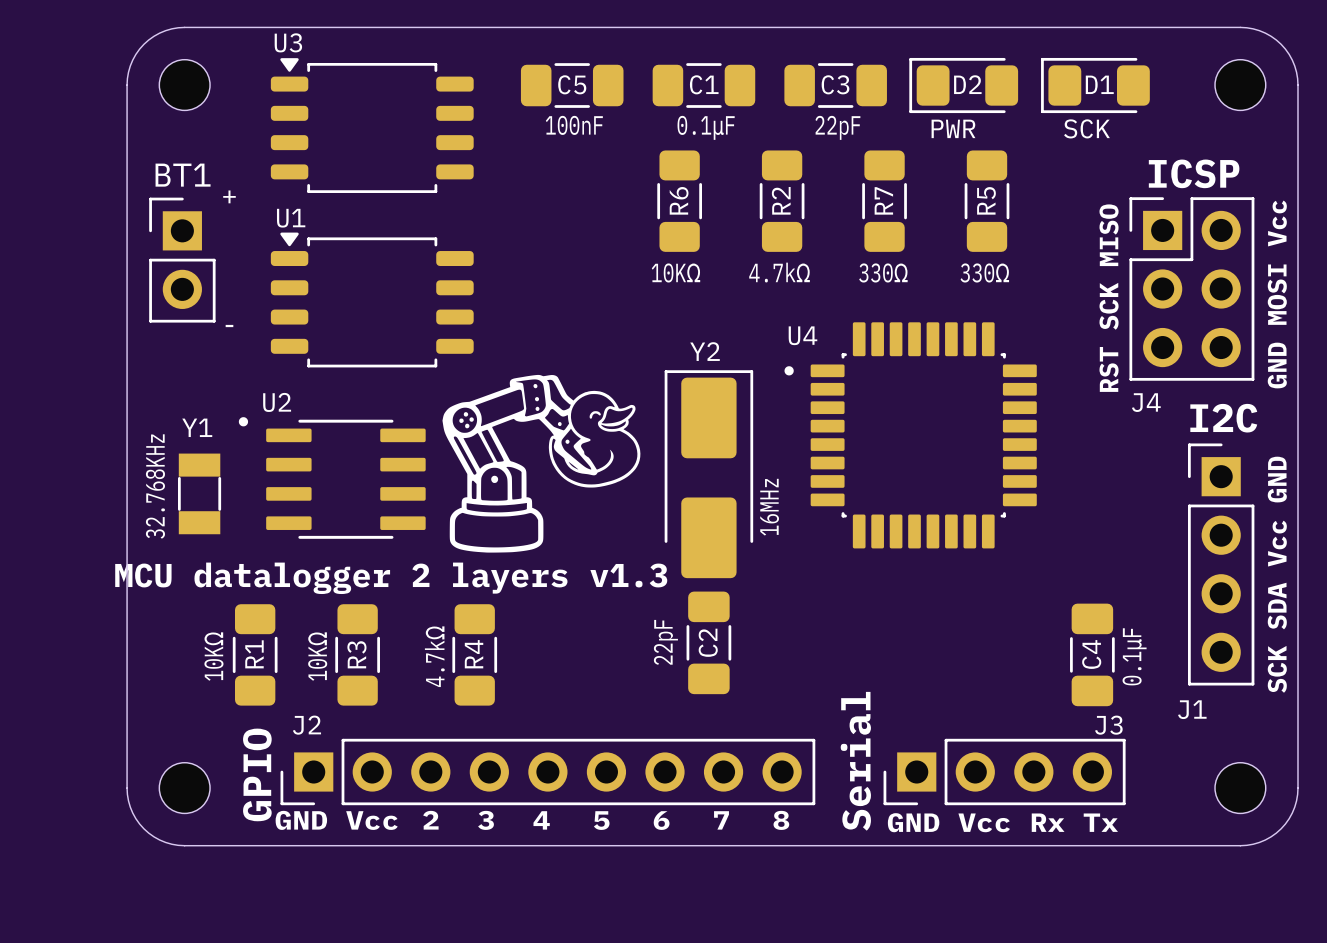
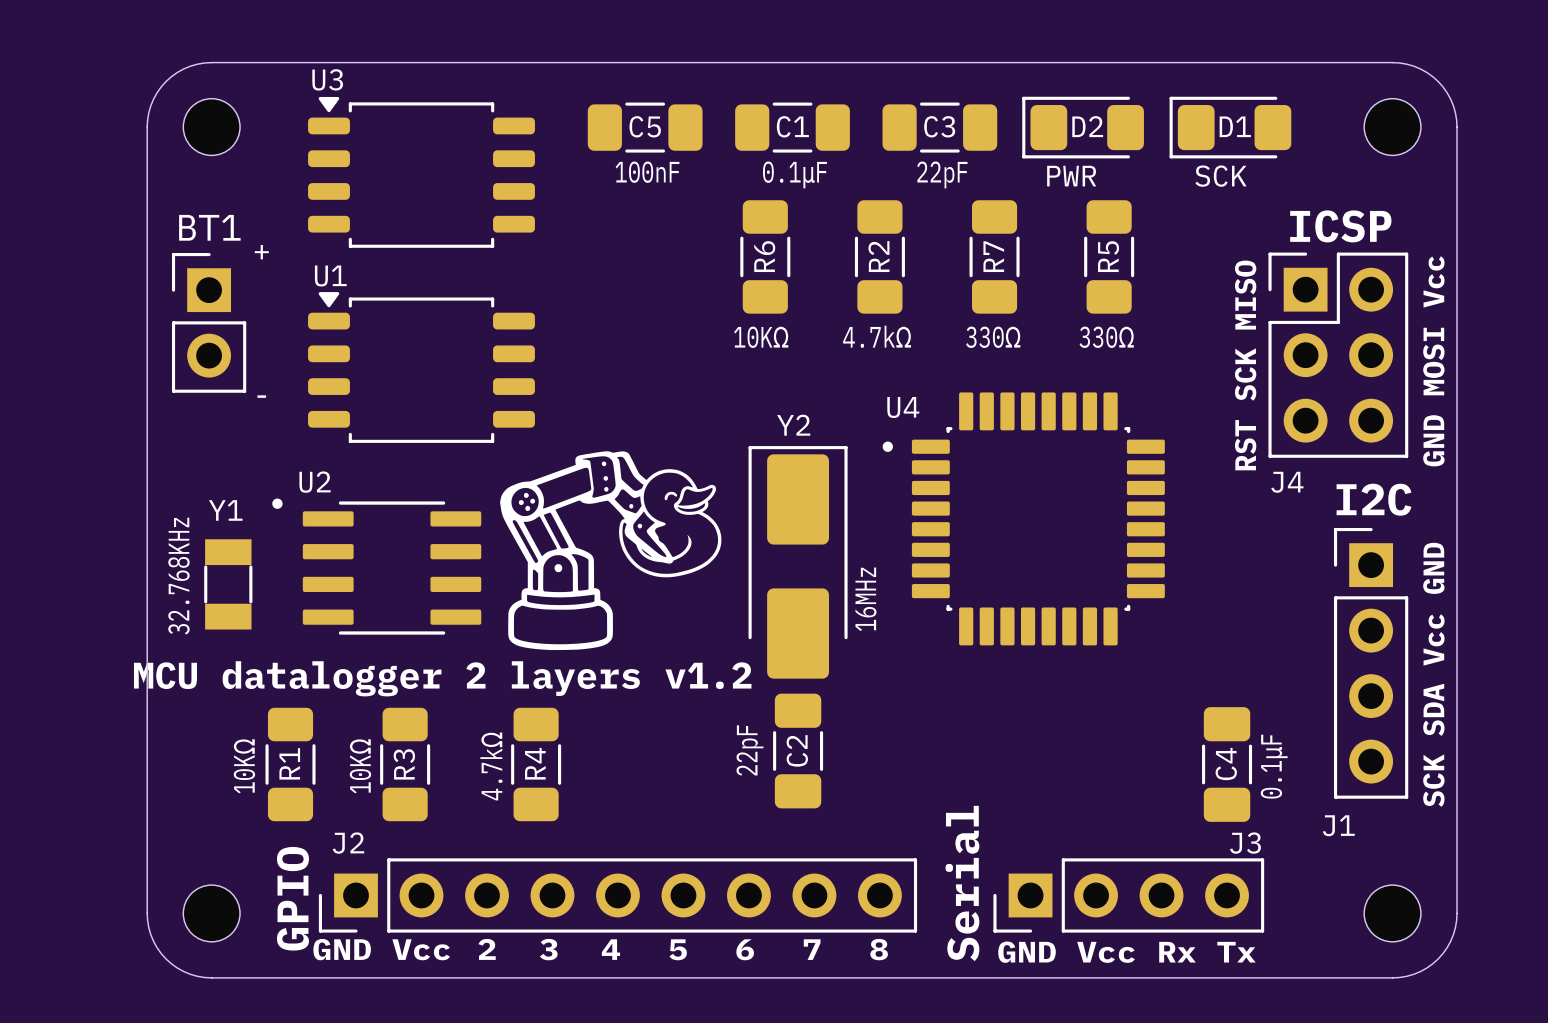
text: MCU datalogger 2 layers v1.3 (391, 578) -> MCU datalogger 2 layers v1.2 (442, 678)

